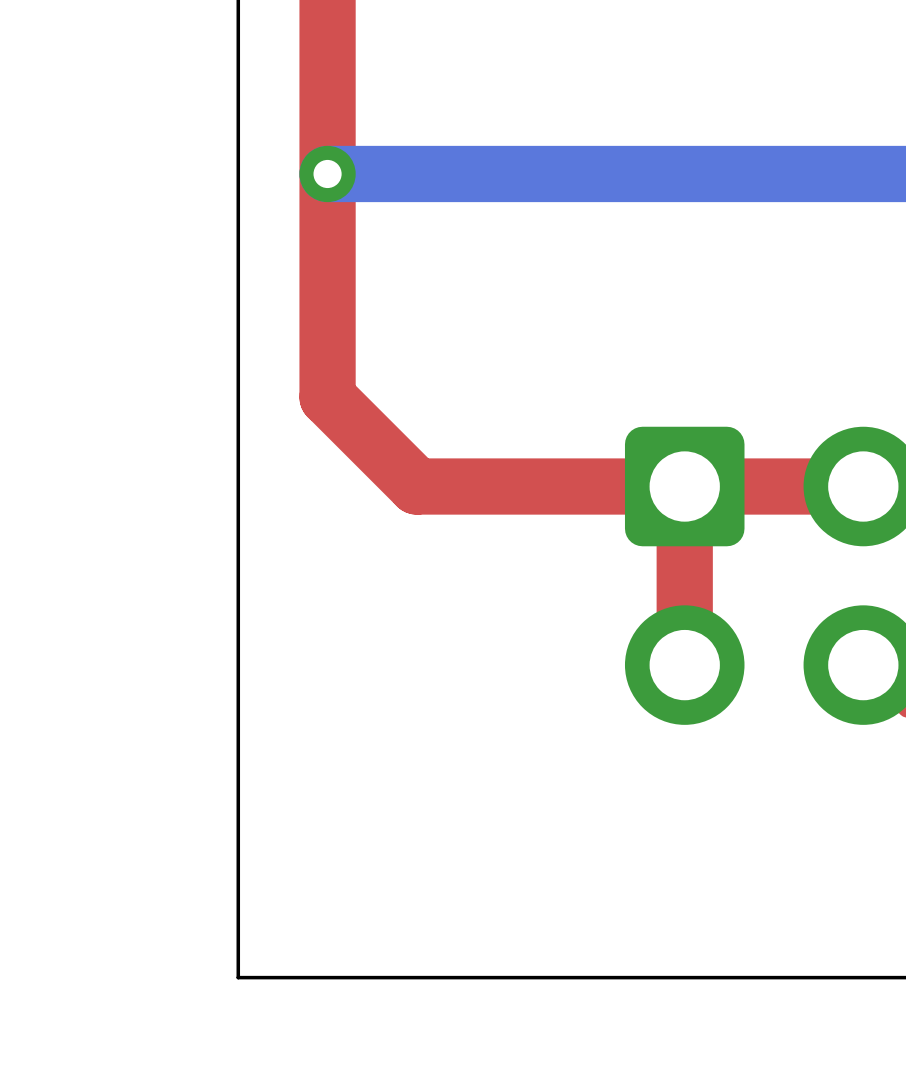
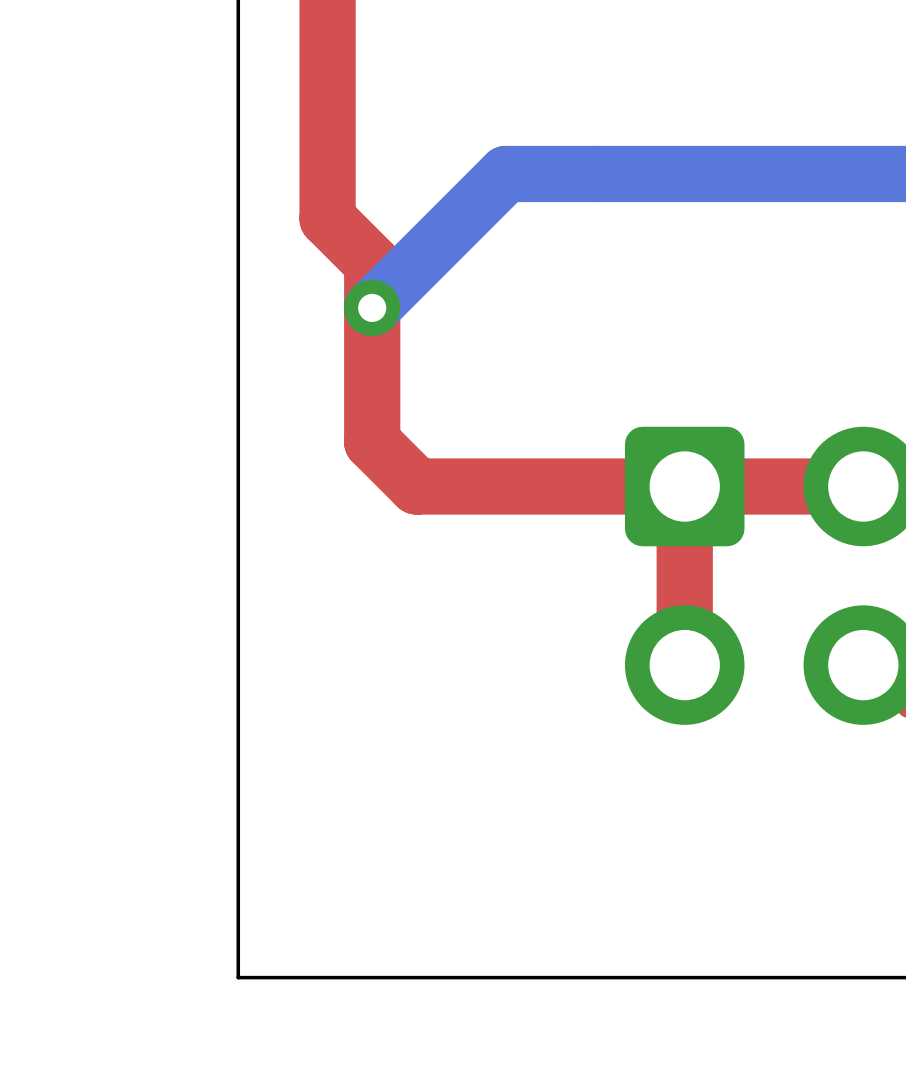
via position: (327, 173) -> (372, 307)
bottom track: (506, 173) (327, 173) -> (506, 173) (372, 307)
top track: (327, 218) (327, 397) (372, 441) -> (327, 218) (372, 263) (372, 441)

